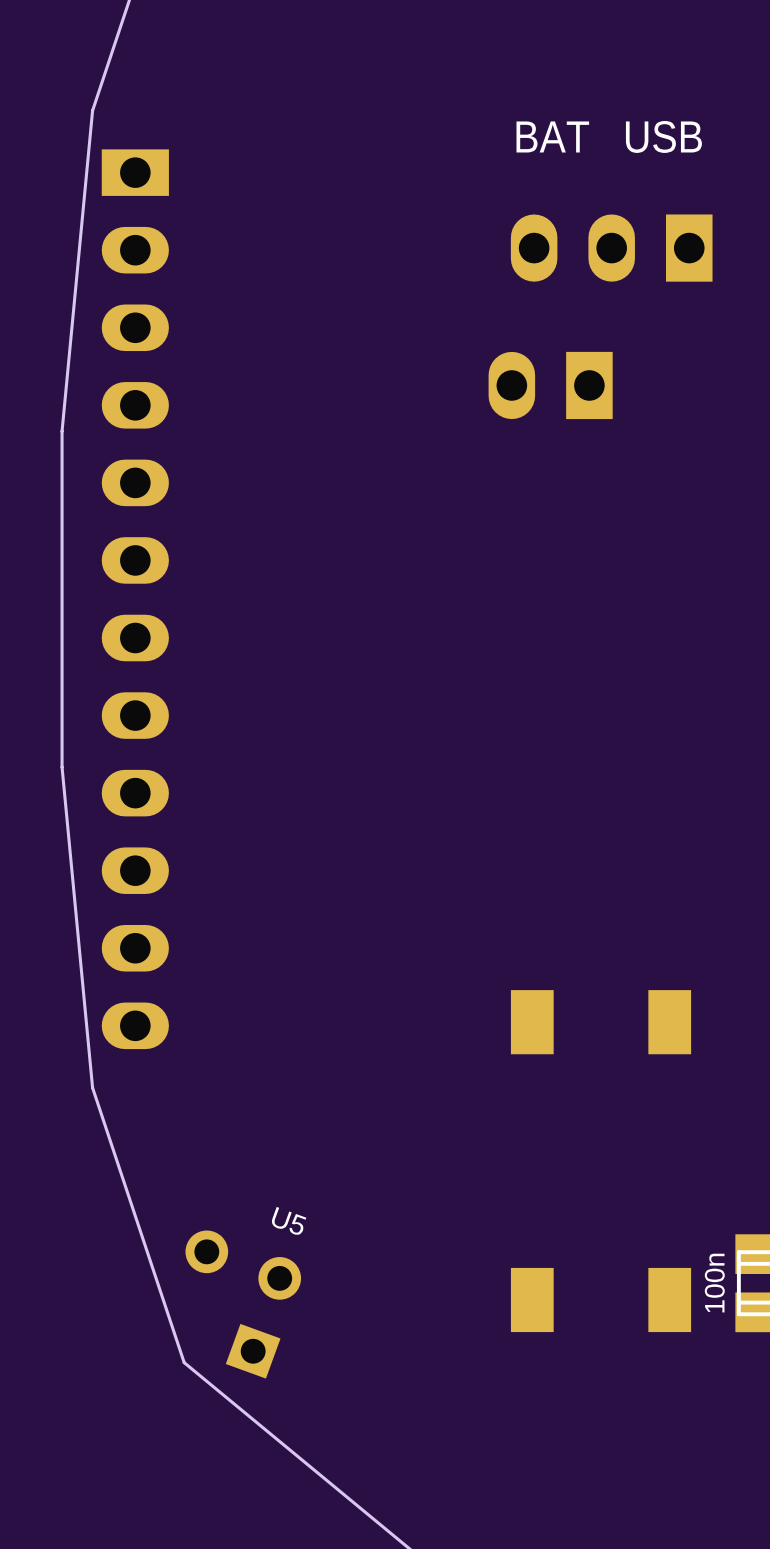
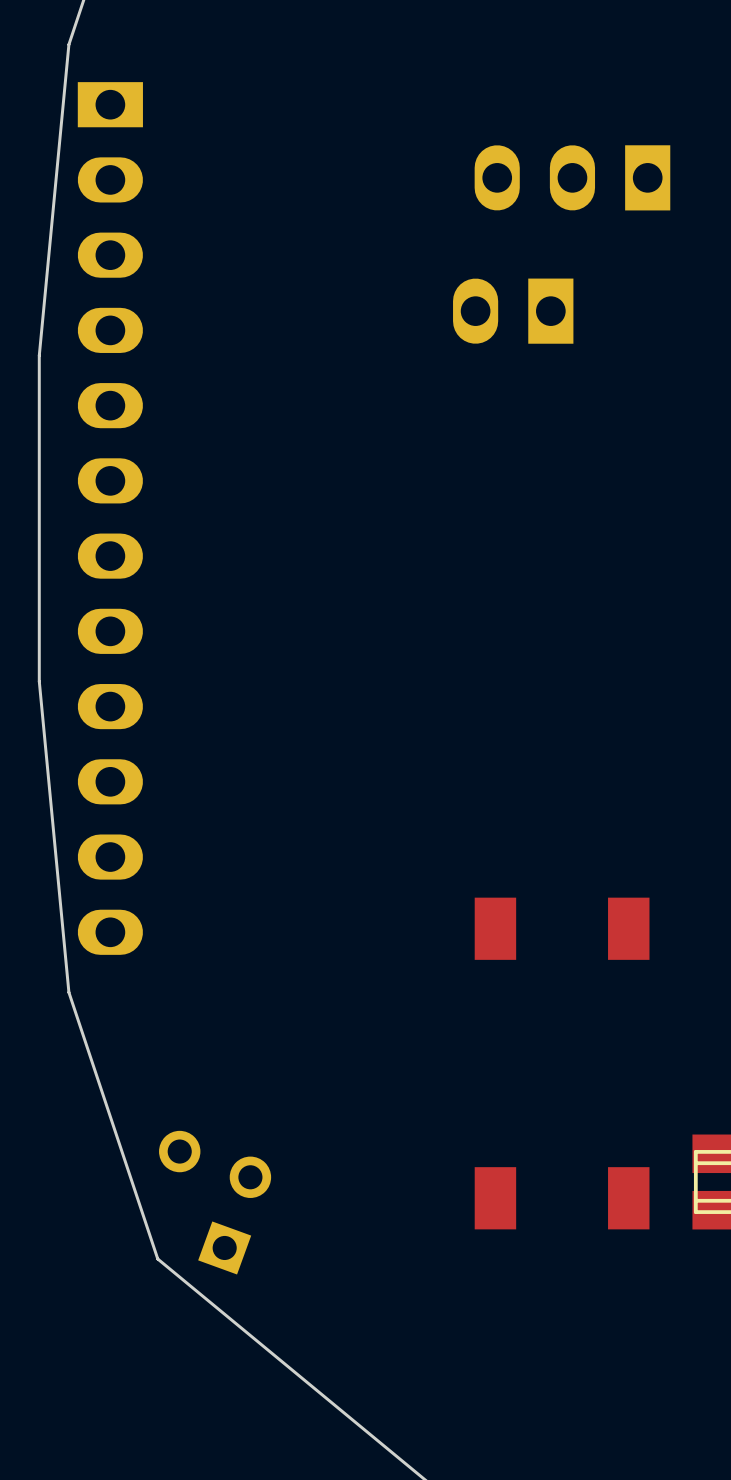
part value: BAT USB (609, 136) -> none
U5 name: U5 (289, 1221) -> none
part value: 100n (714, 1283) -> none

